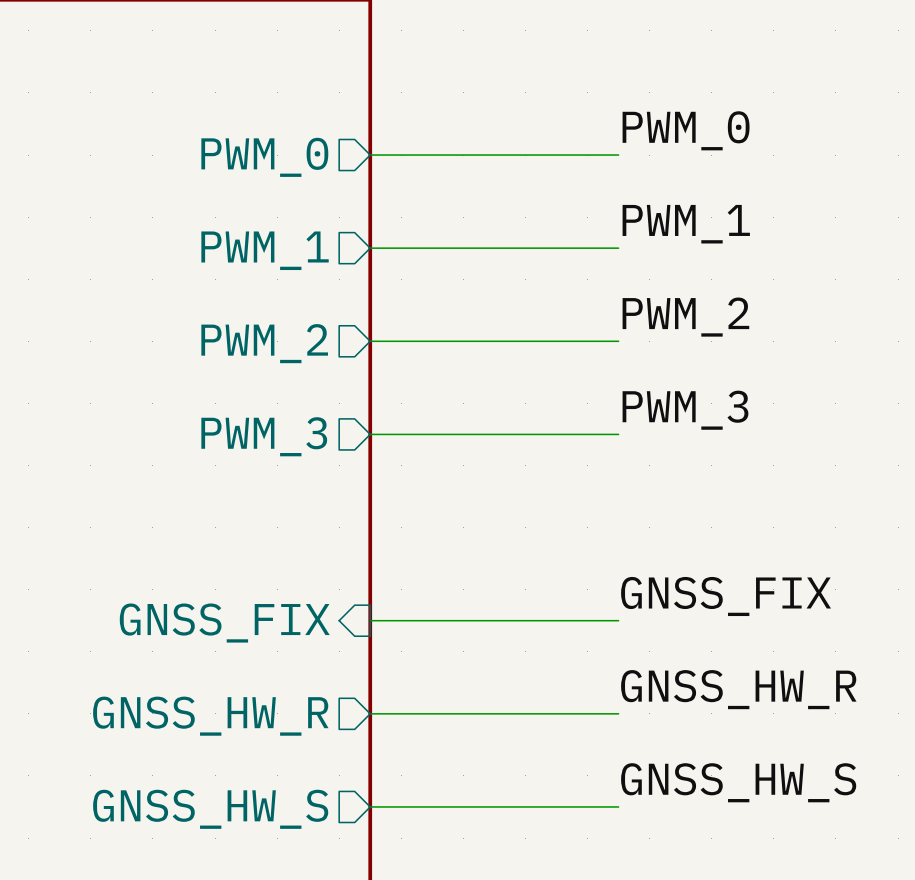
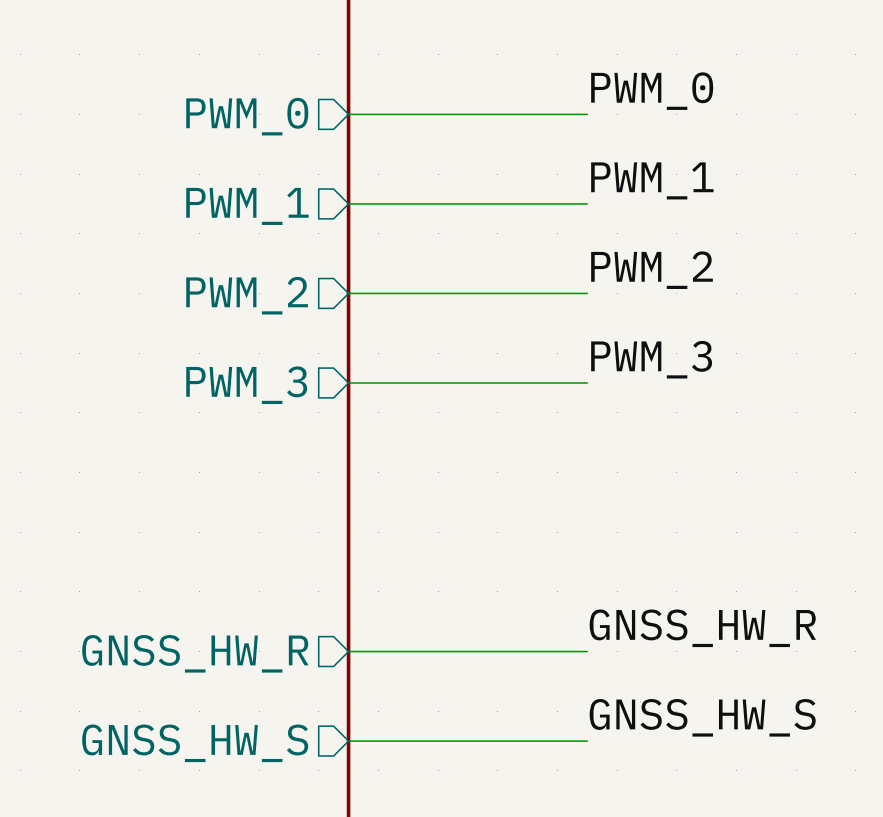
label: GNSS_FIX (726, 596) -> none
wire: (370, 620) (618, 620) -> none
sheet pin: GNSS_FIX (224, 623) -> none

